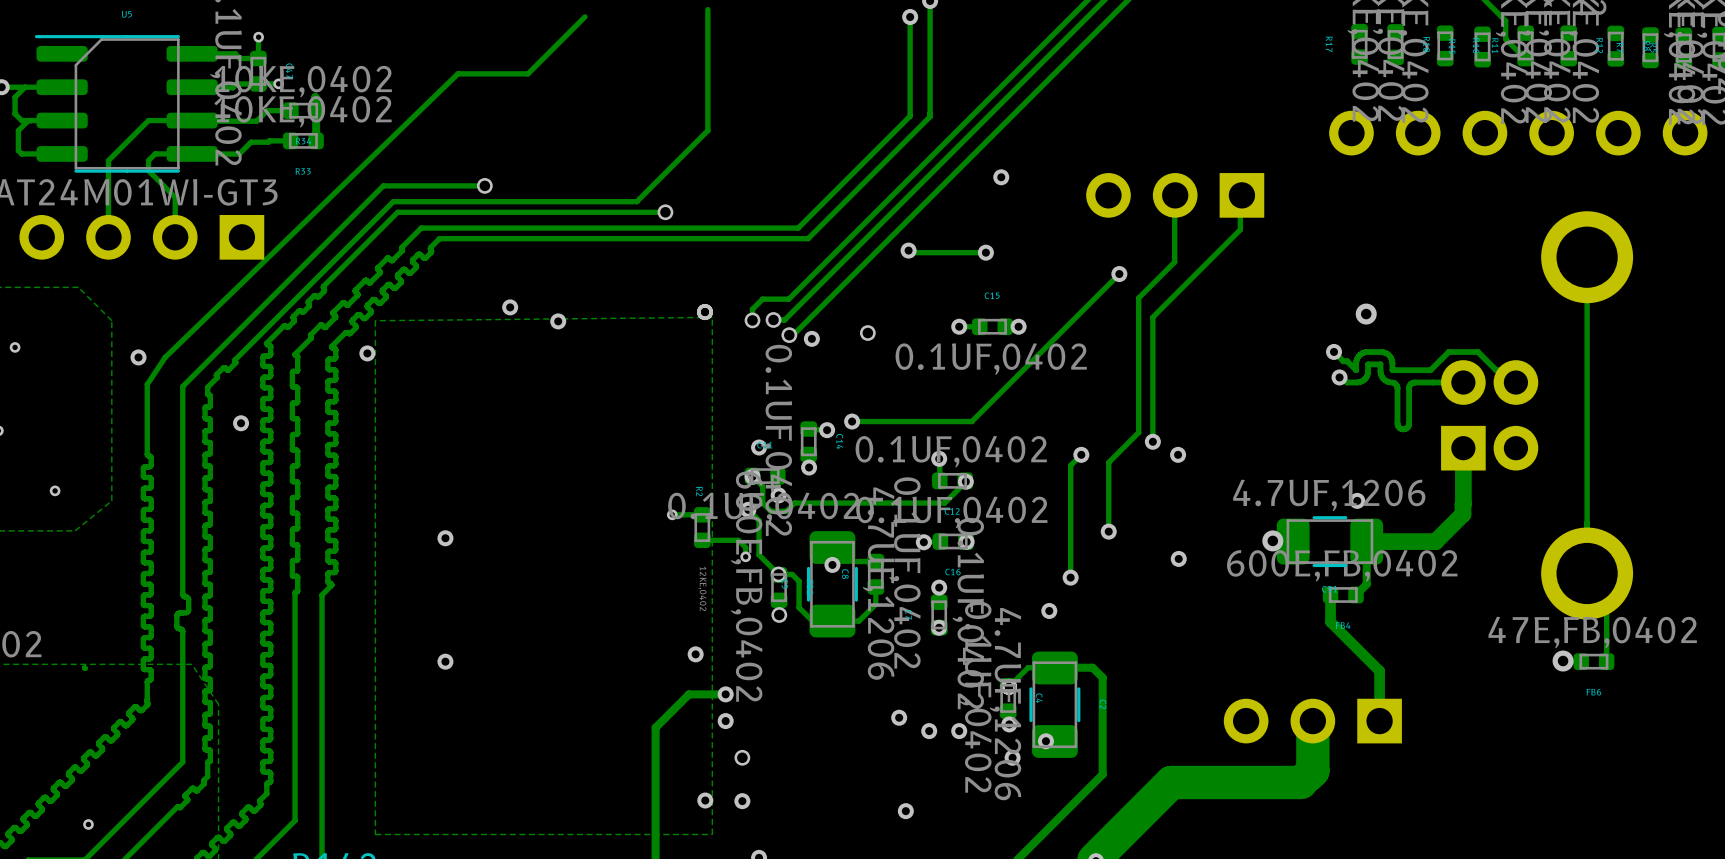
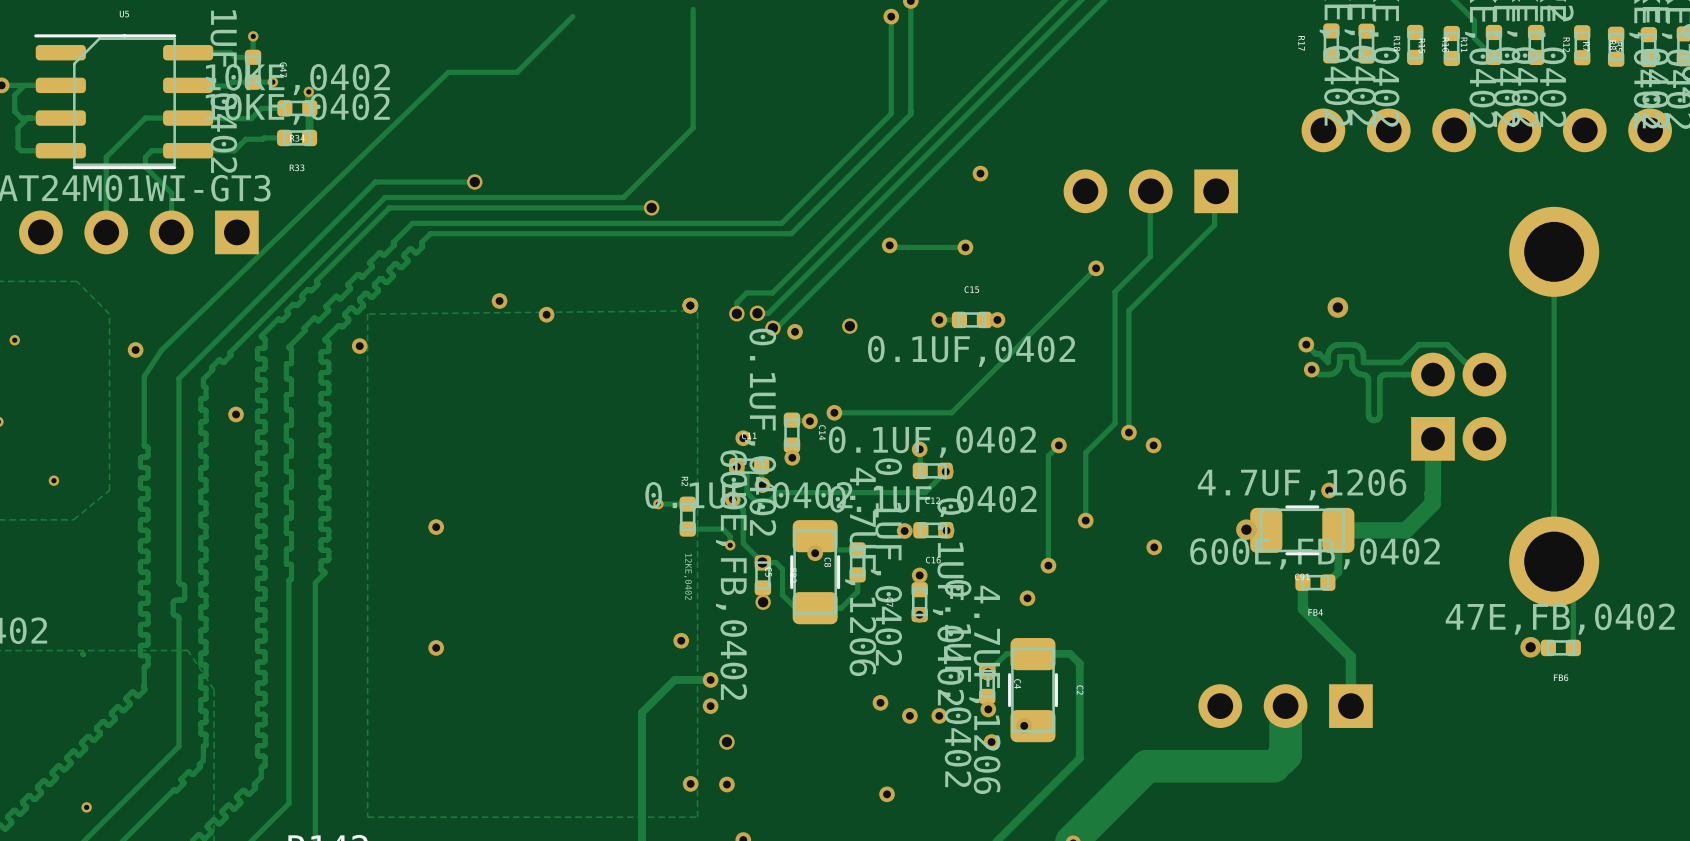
via: none -> (308, 91)

